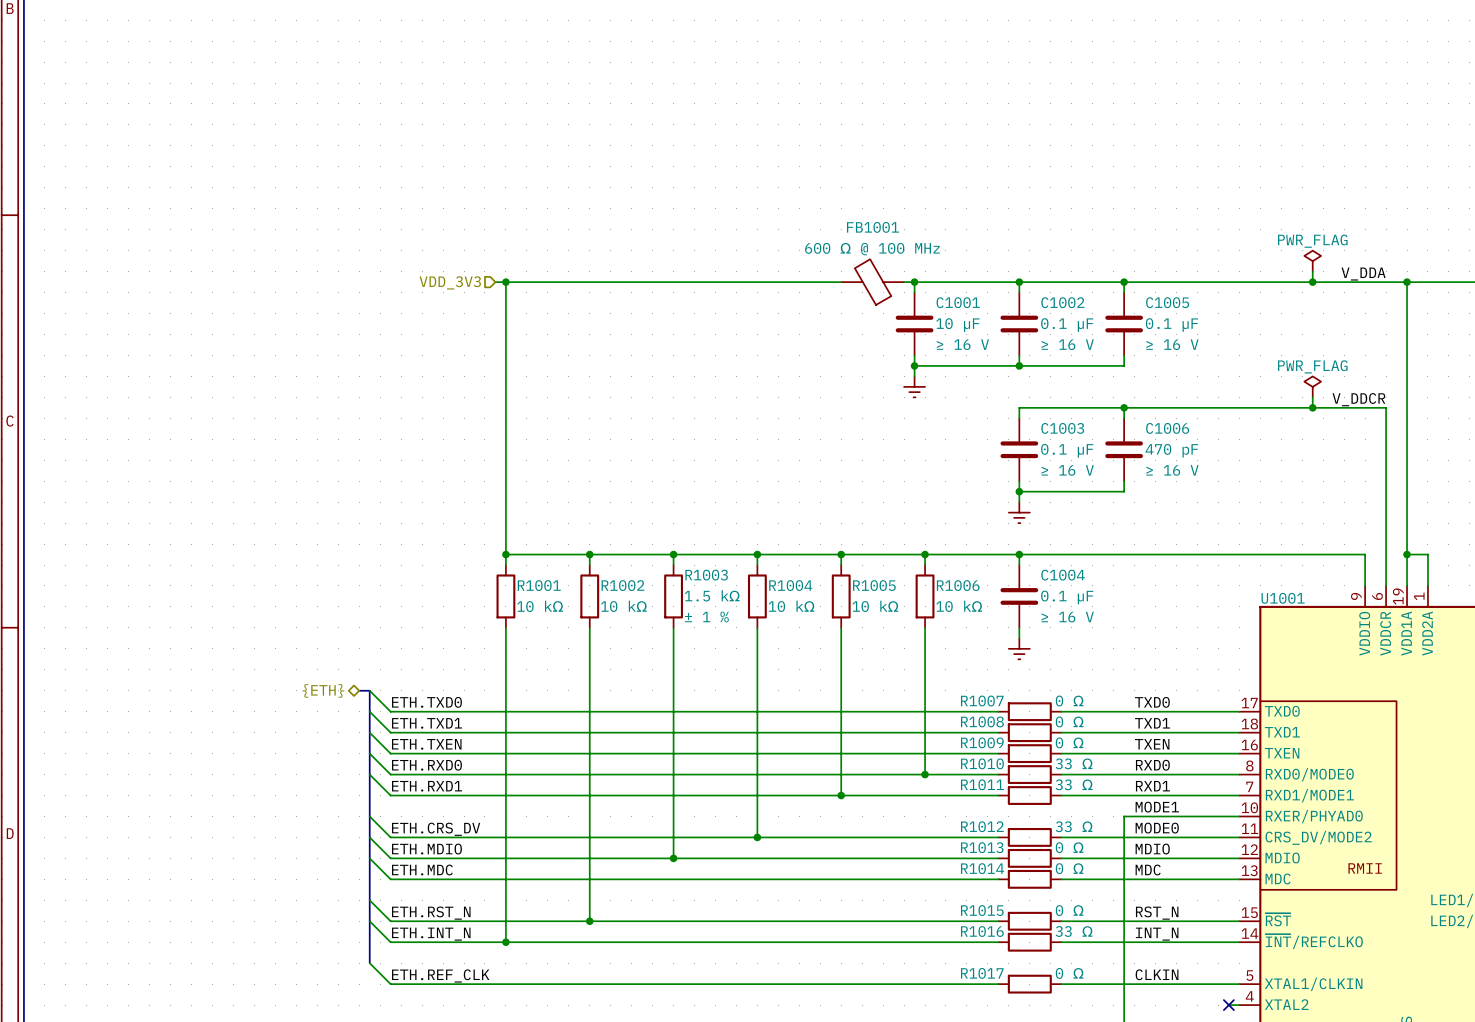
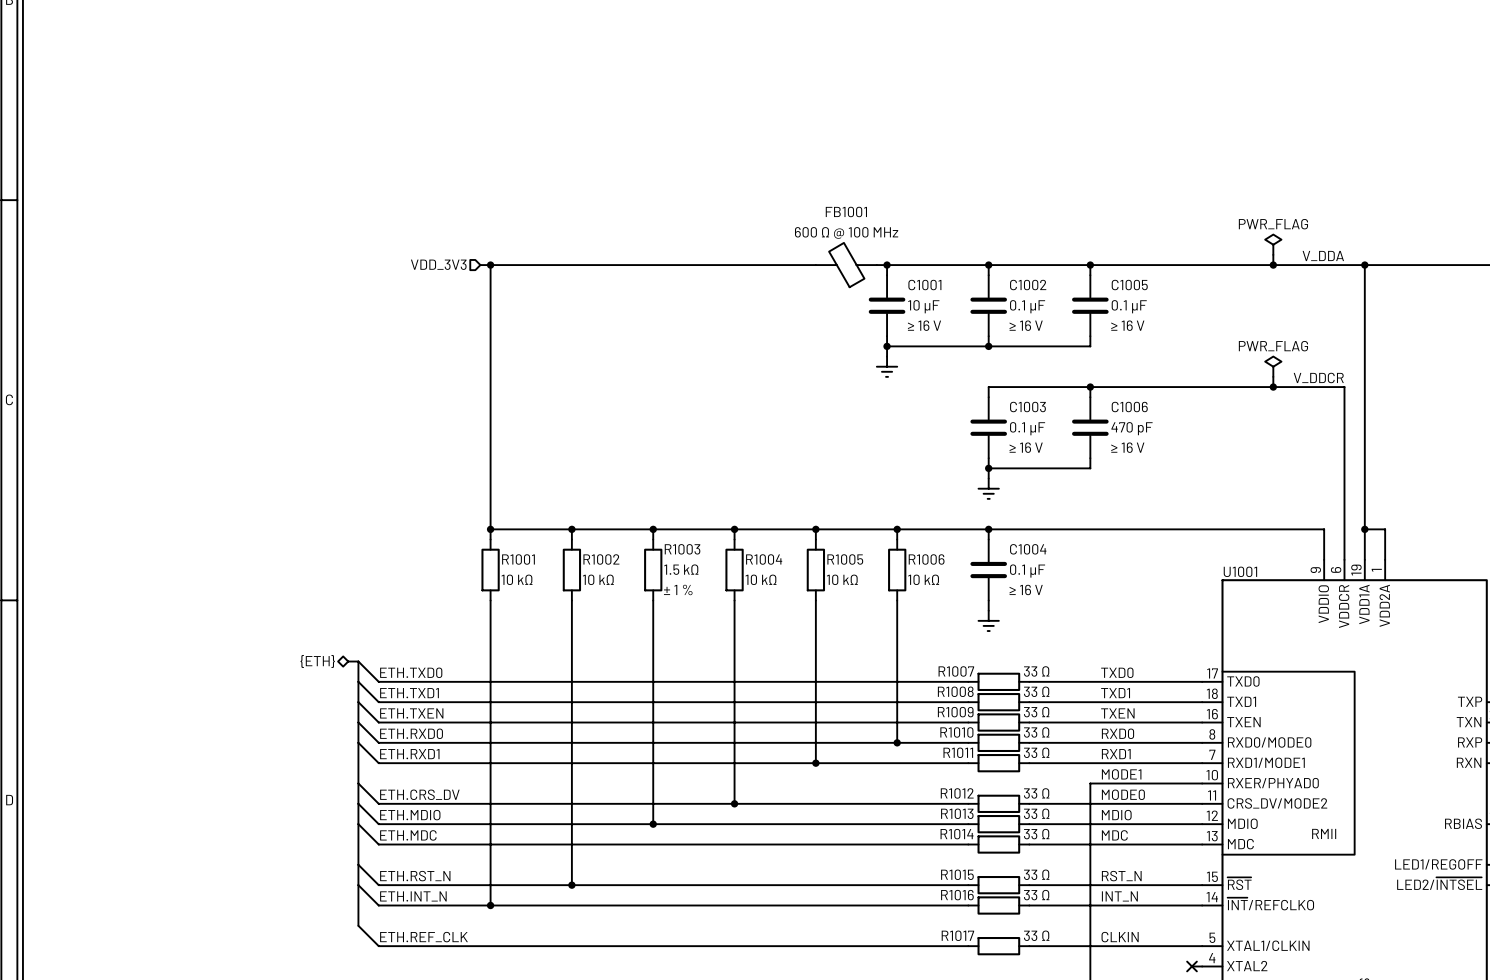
R1007 value: 0 Ω (1069, 700) -> 33 Ω (1036, 671)
R1008 value: 0 Ω (1069, 721) -> 33 Ω (1036, 691)
R1009 value: 0 Ω (1069, 742) -> 33 Ω (1036, 712)
R1013 value: 0 Ω (1069, 847) -> 33 Ω (1036, 813)
R1014 value: 0 Ω (1069, 868) -> 33 Ω (1036, 834)
R1015 value: 0 Ω (1069, 910) -> 33 Ω (1036, 874)
R1017 value: 0 Ω (1069, 973) -> 33 Ω (1036, 935)

